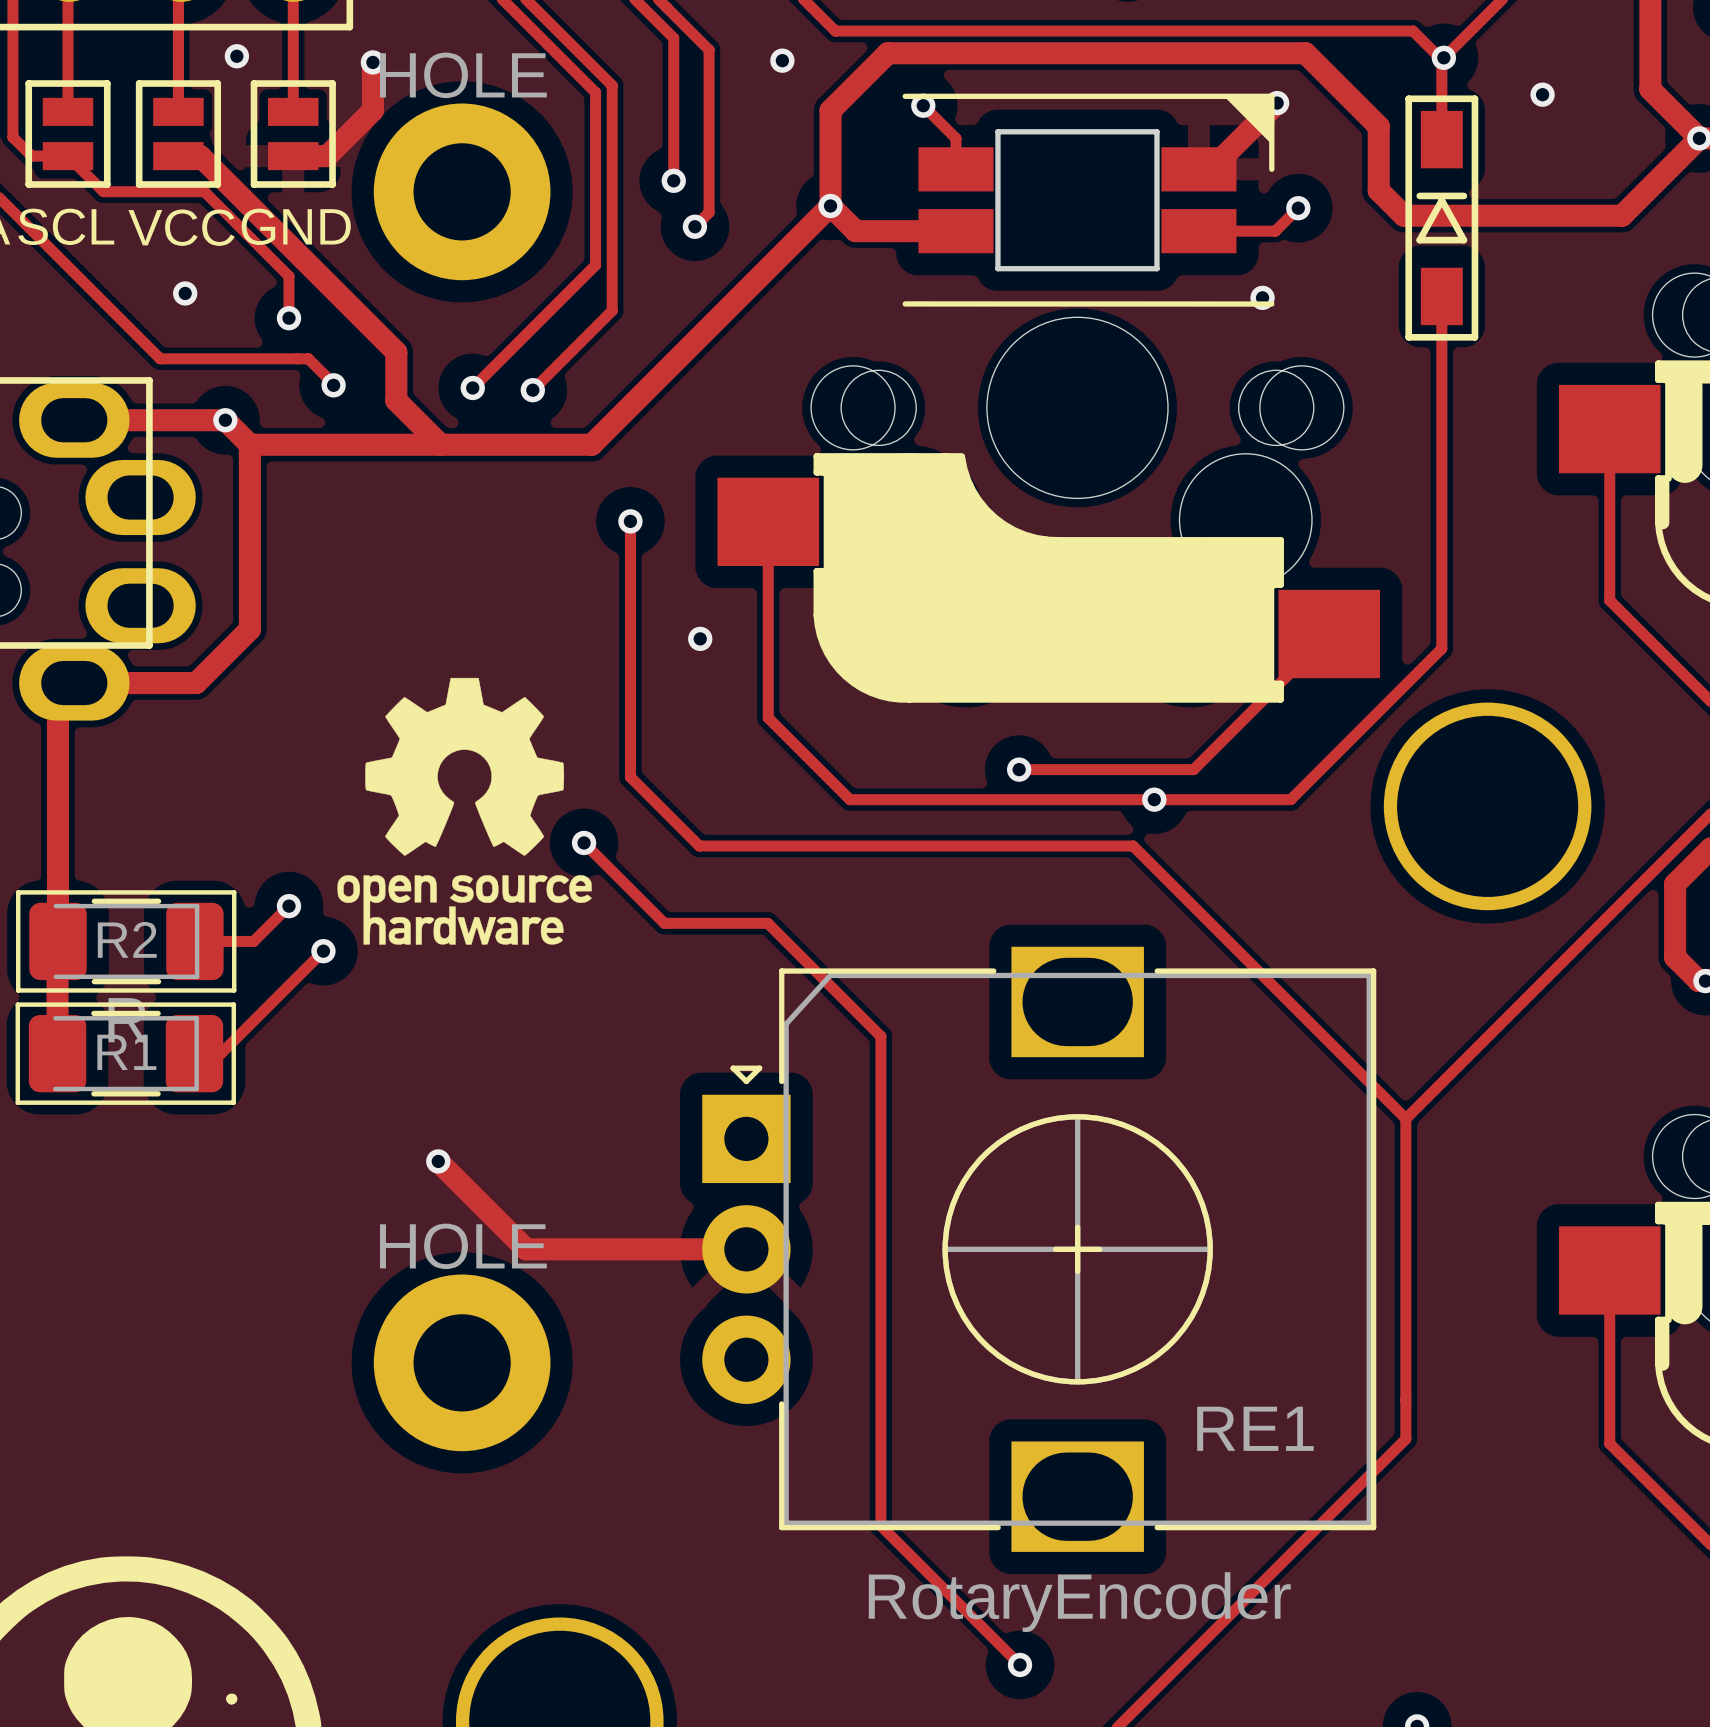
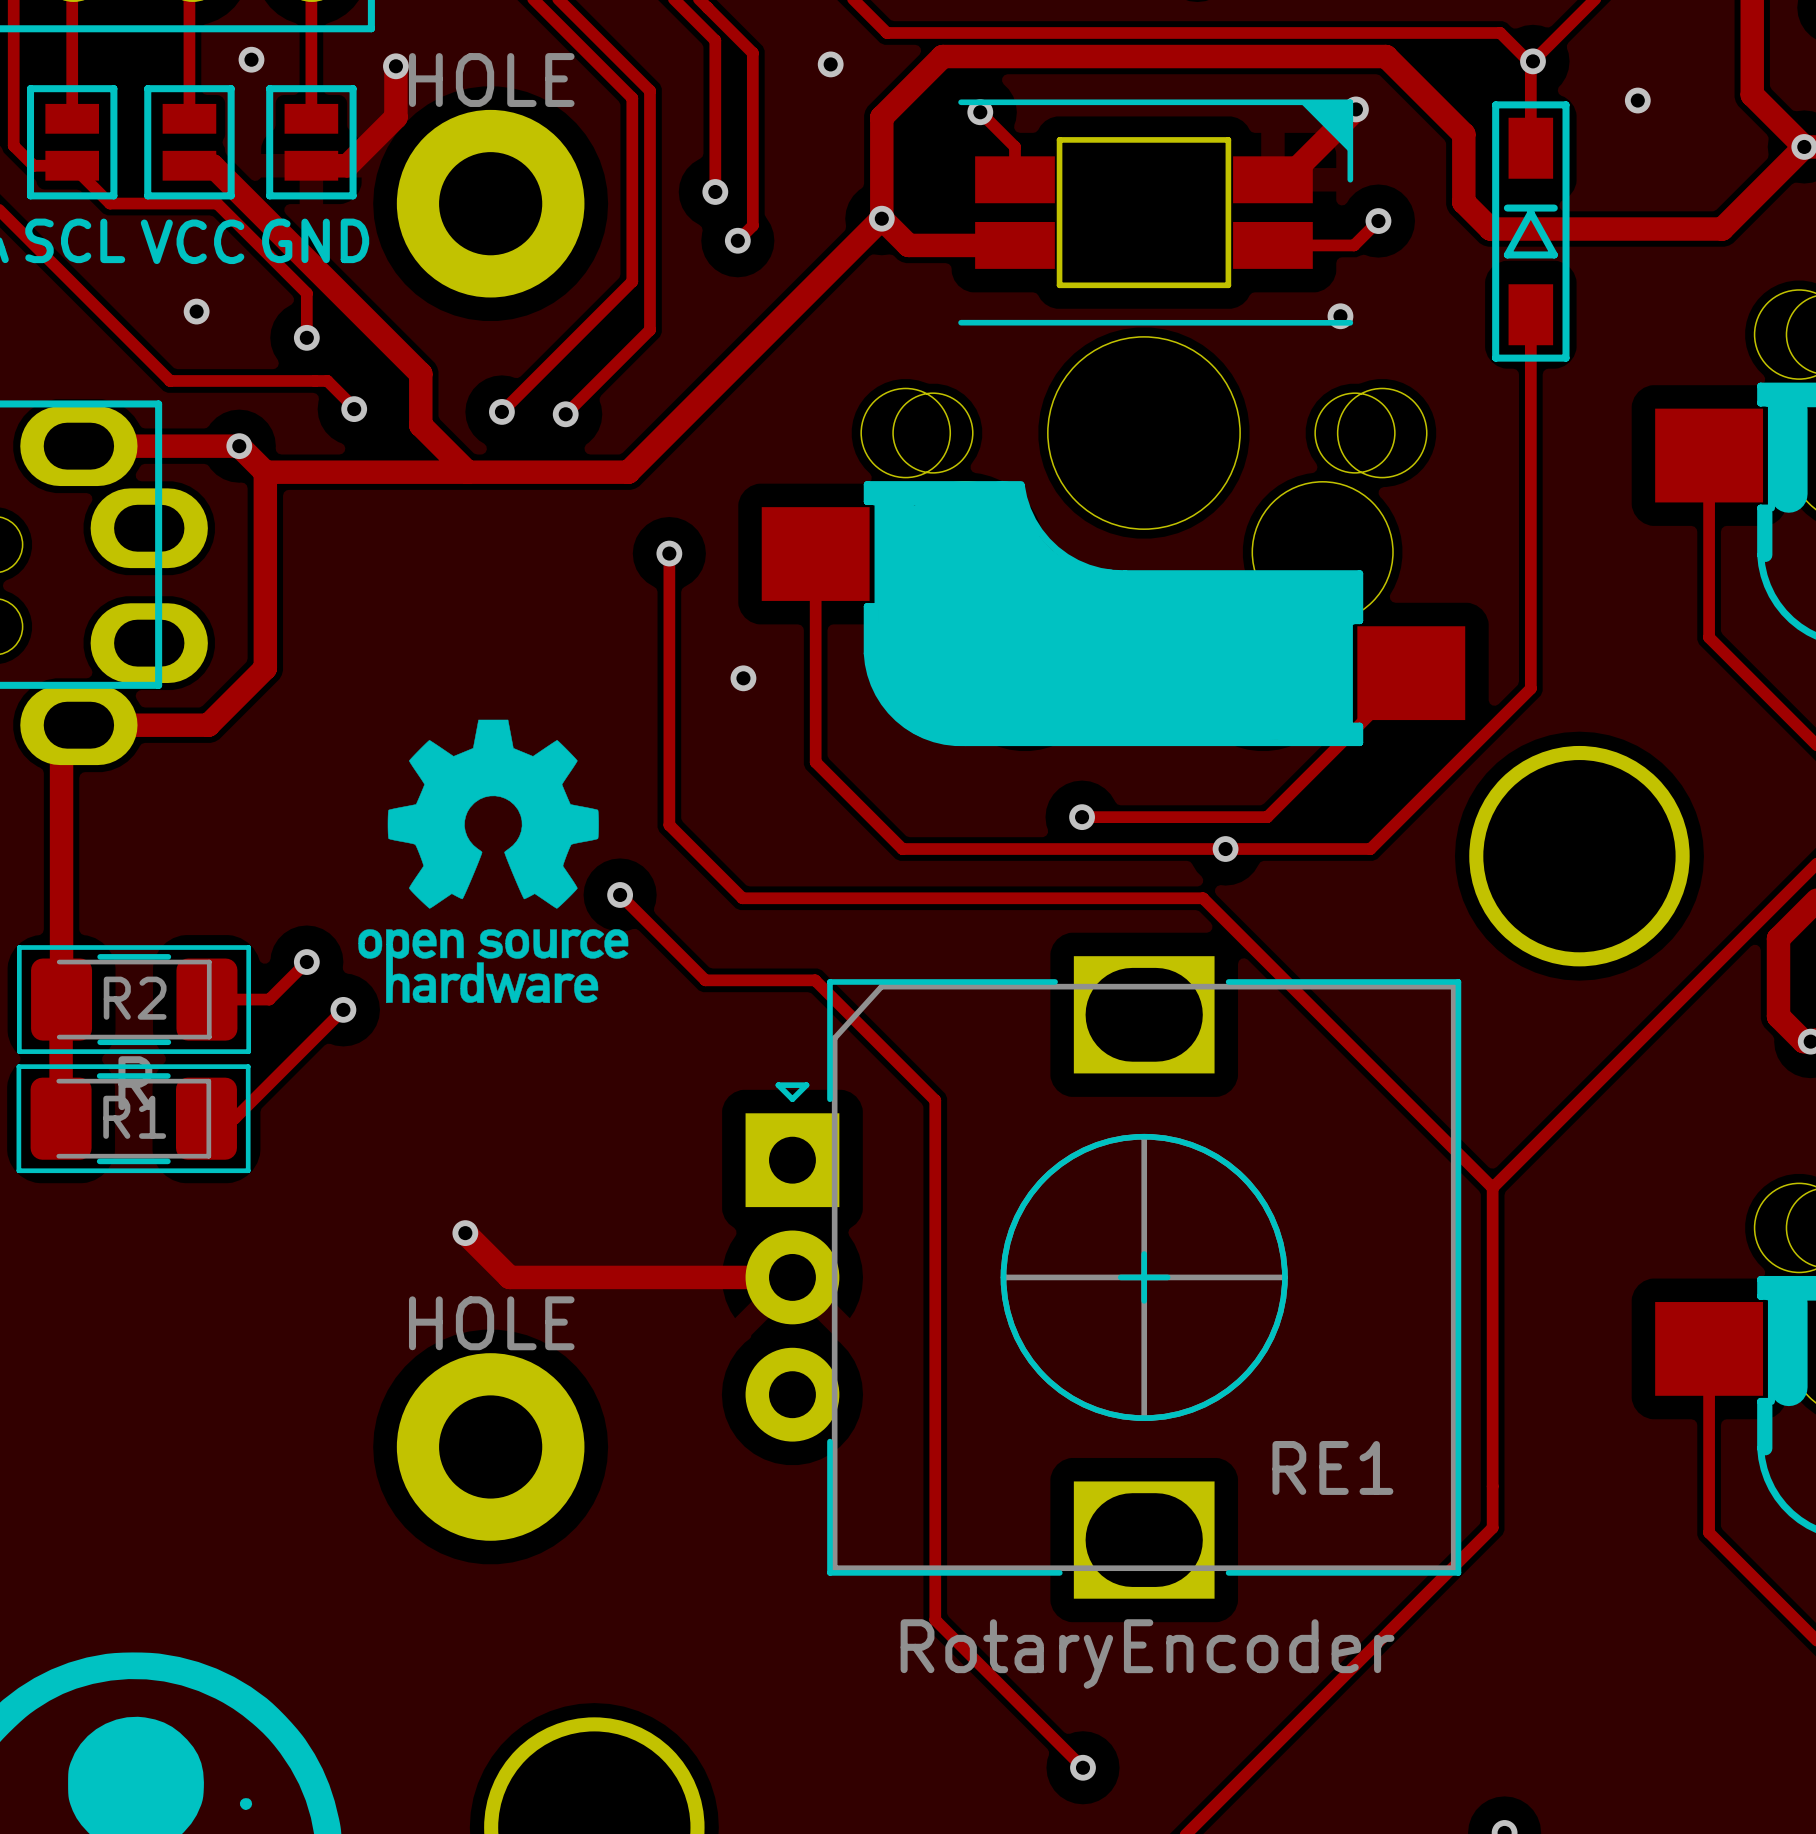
track: (480, 1203) (526, 1249) (746, 1249) -> (509, 1277) (792, 1277)
RE1 position: (1039, 1249) -> (1103, 1277)

